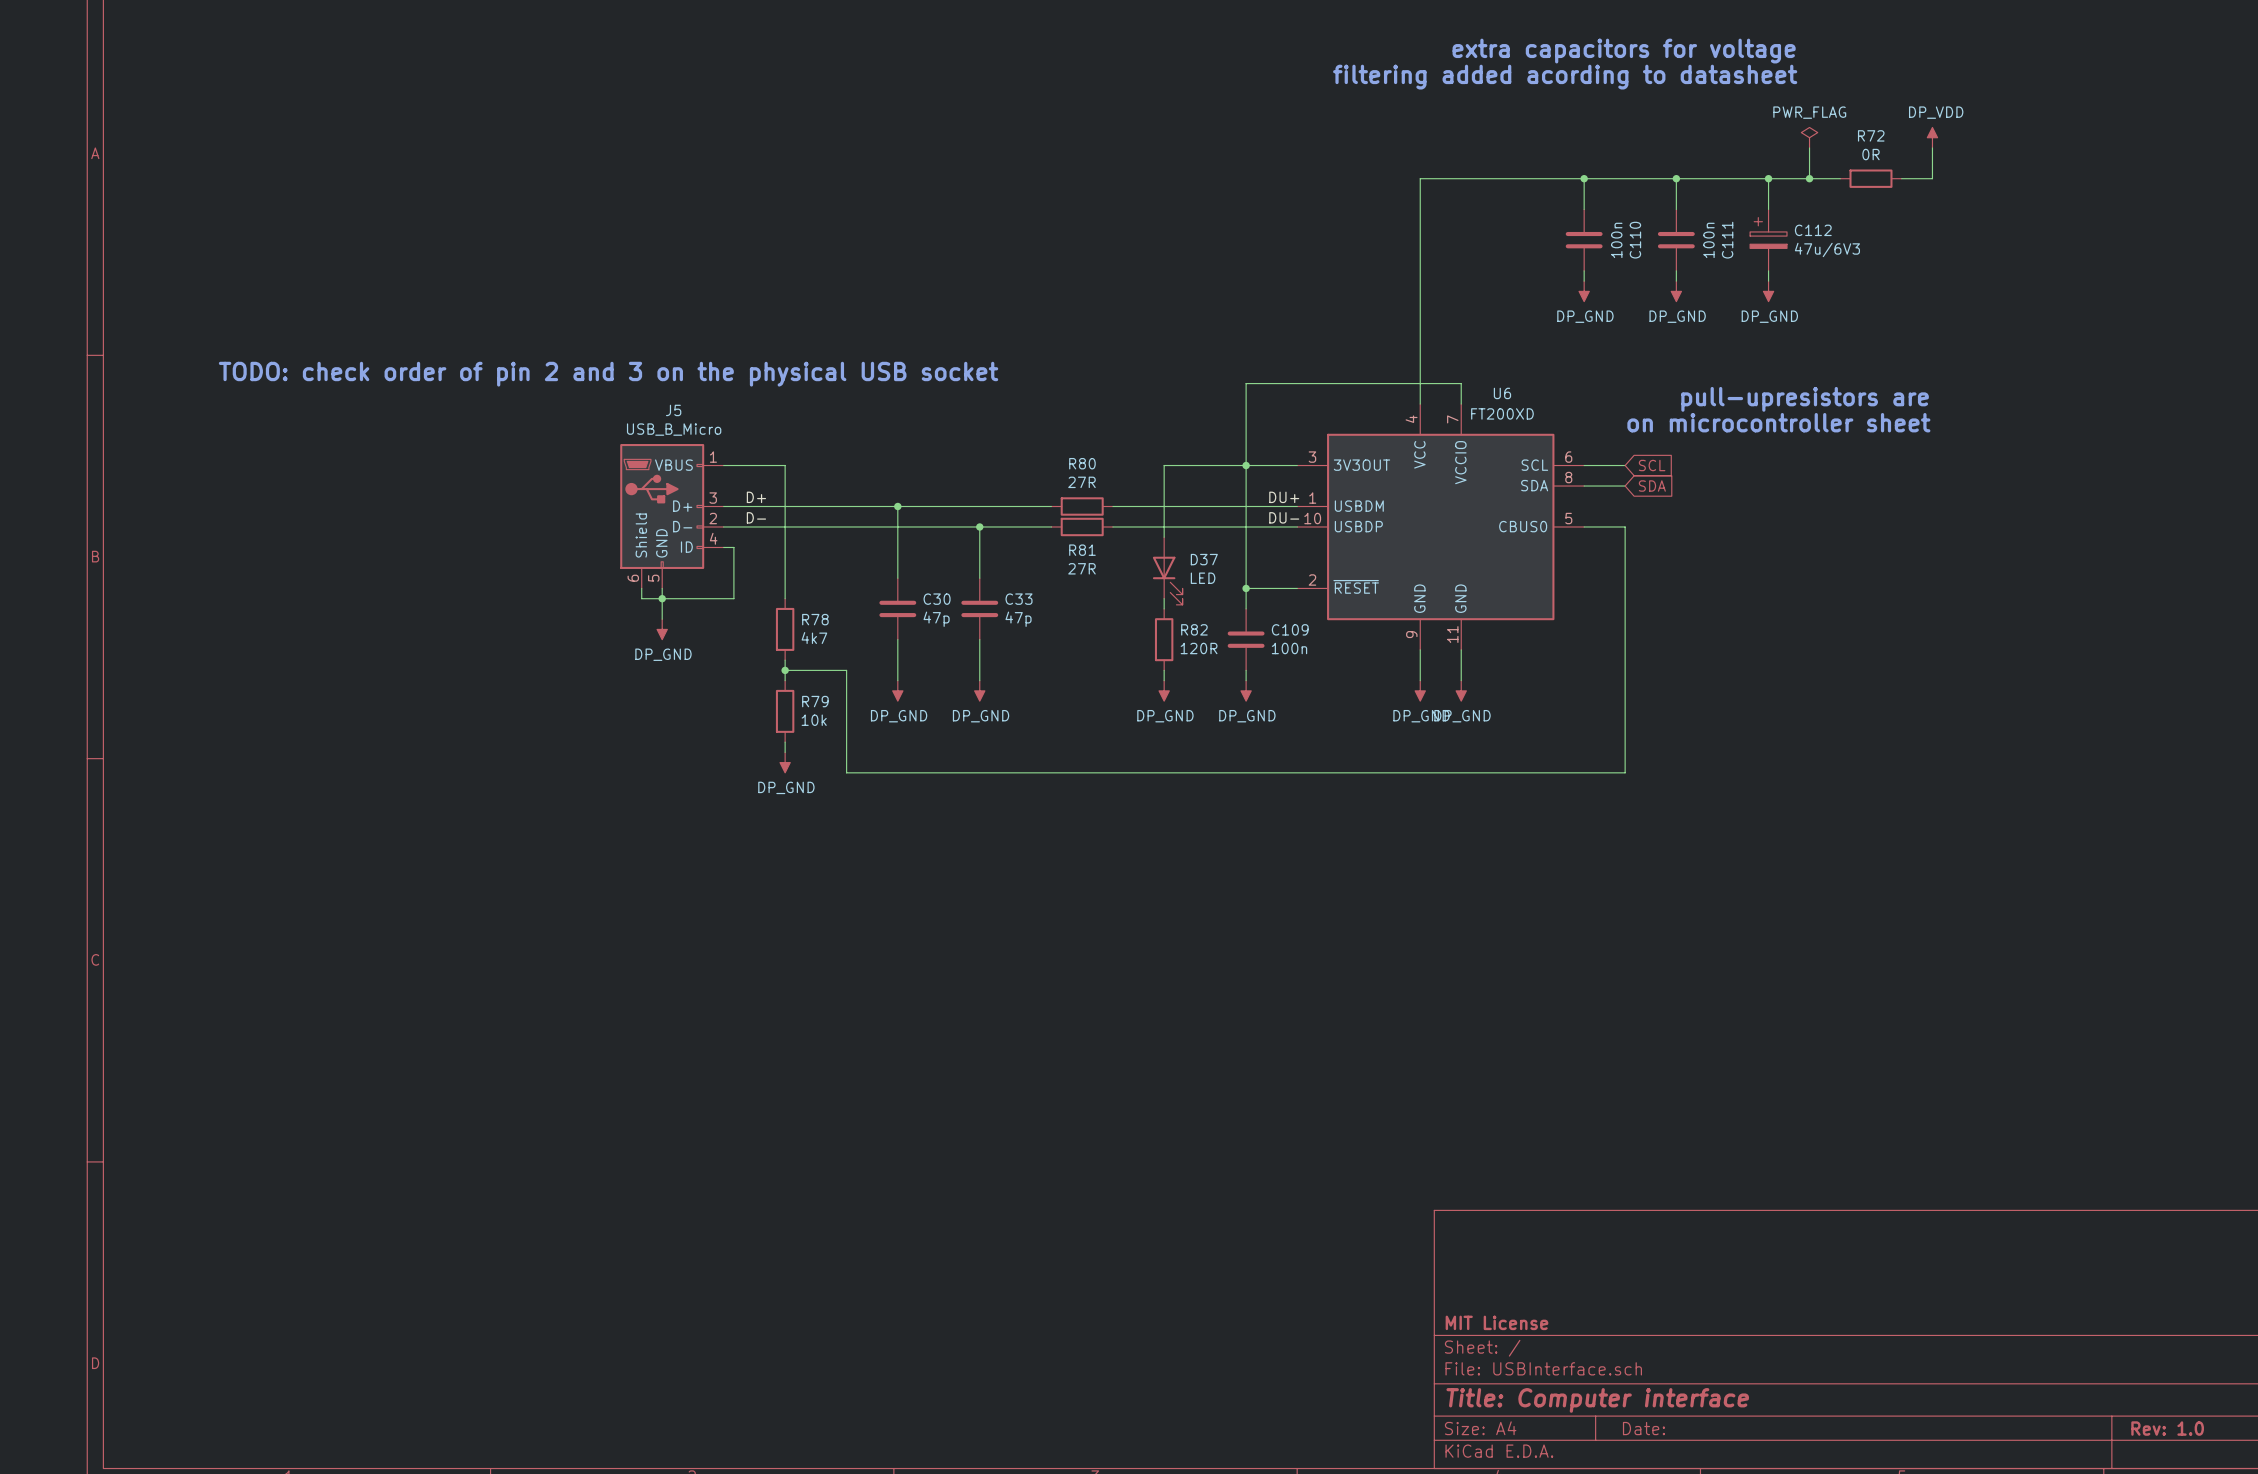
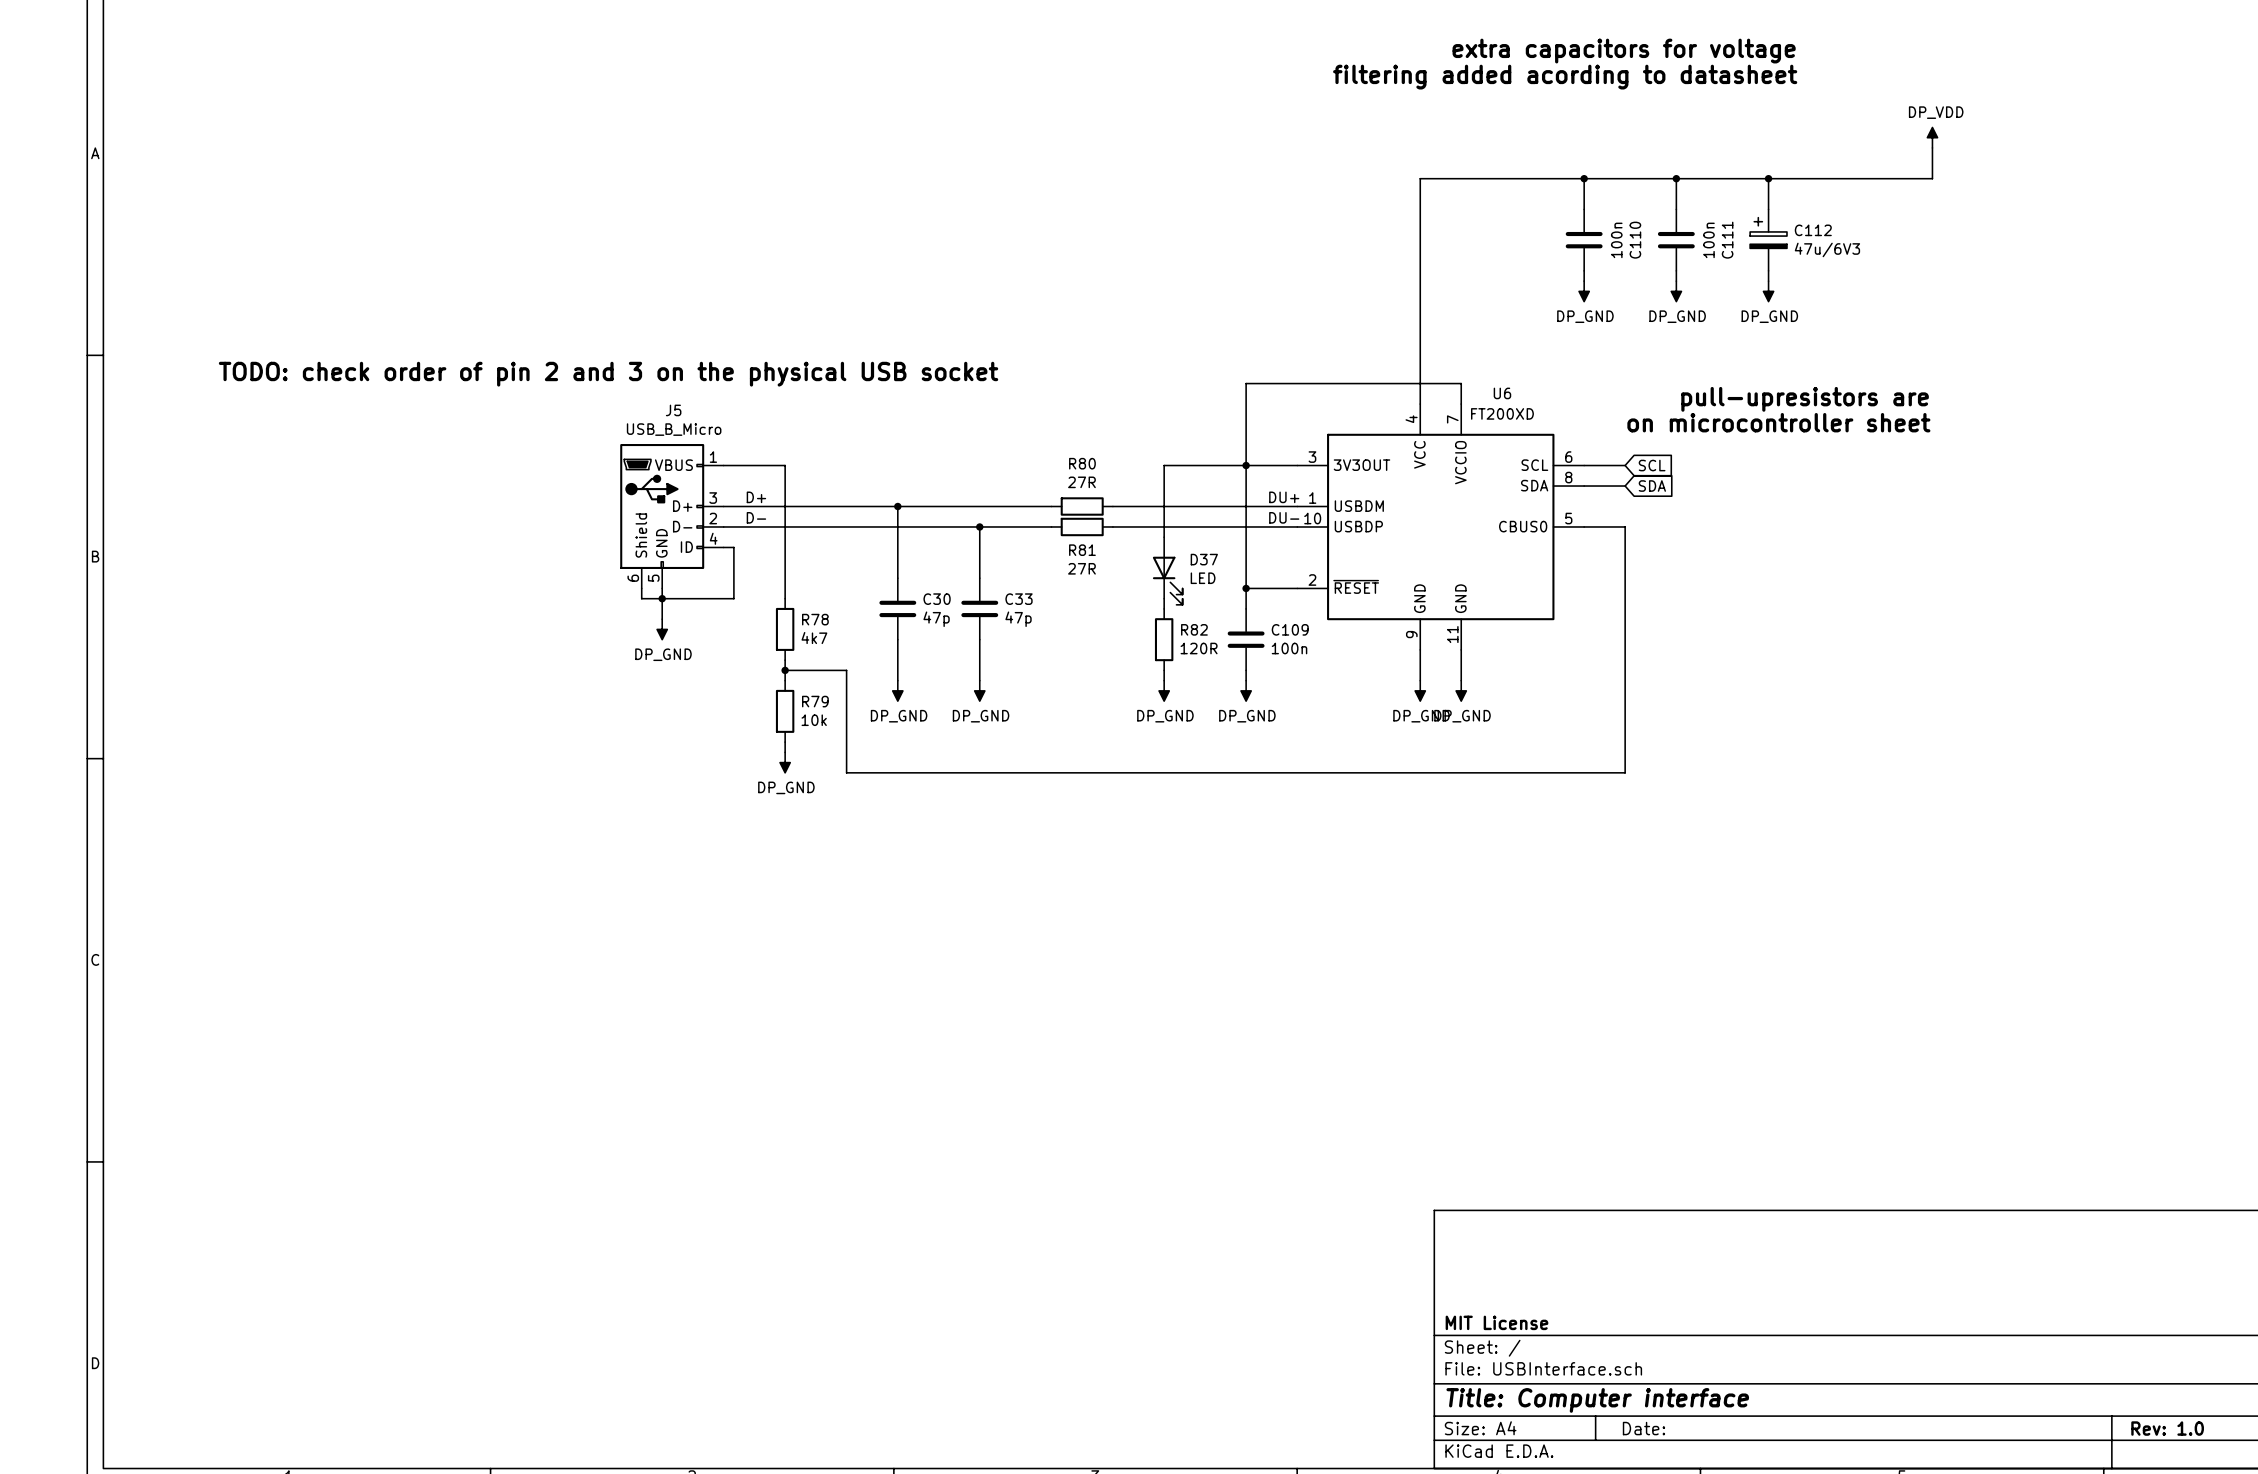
power symbol: PWR_FLAG (1809, 137) -> none
wire: (1809, 147) (1809, 178) -> none
junction: (1809, 178) -> none
wire: none -> (1840, 178) (1901, 178)
R72: 0R (1870, 178) -> none

